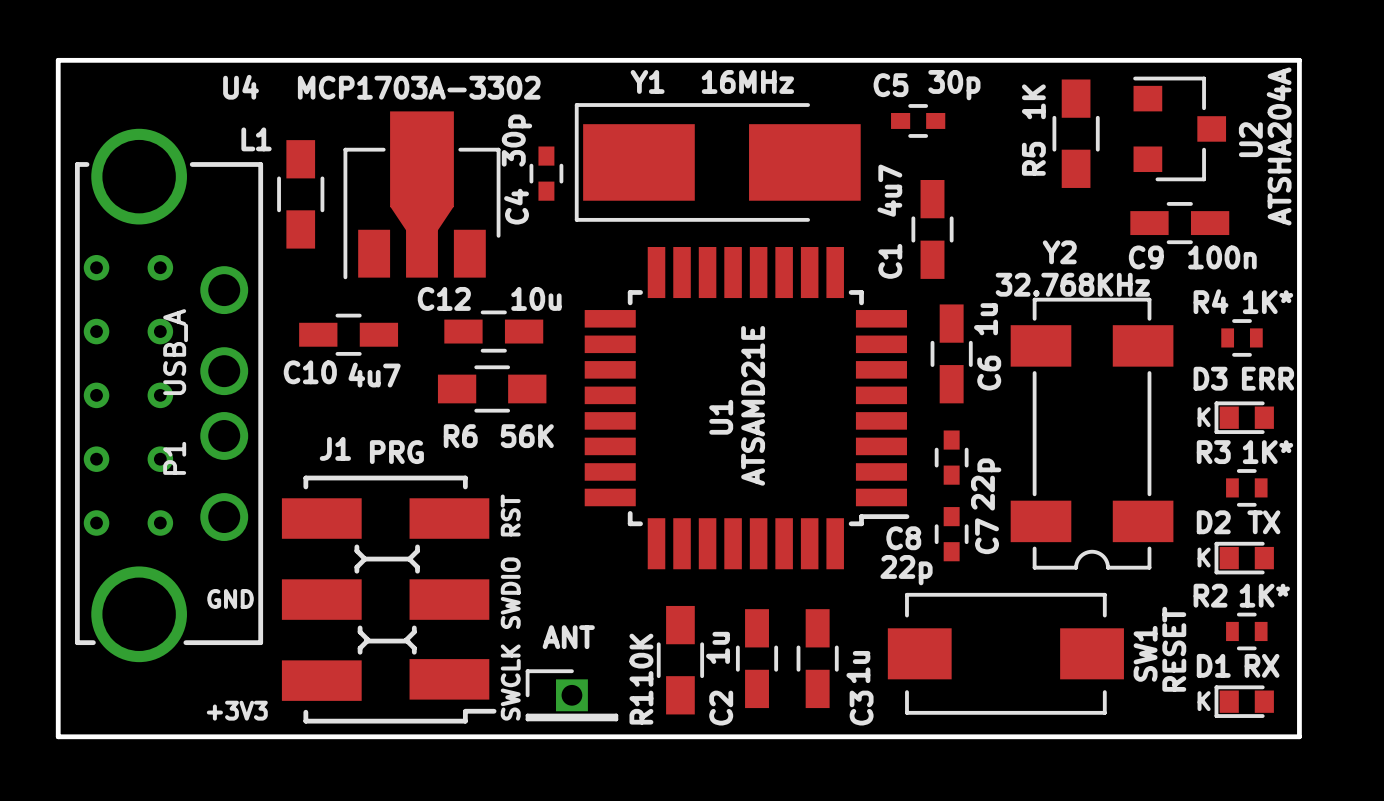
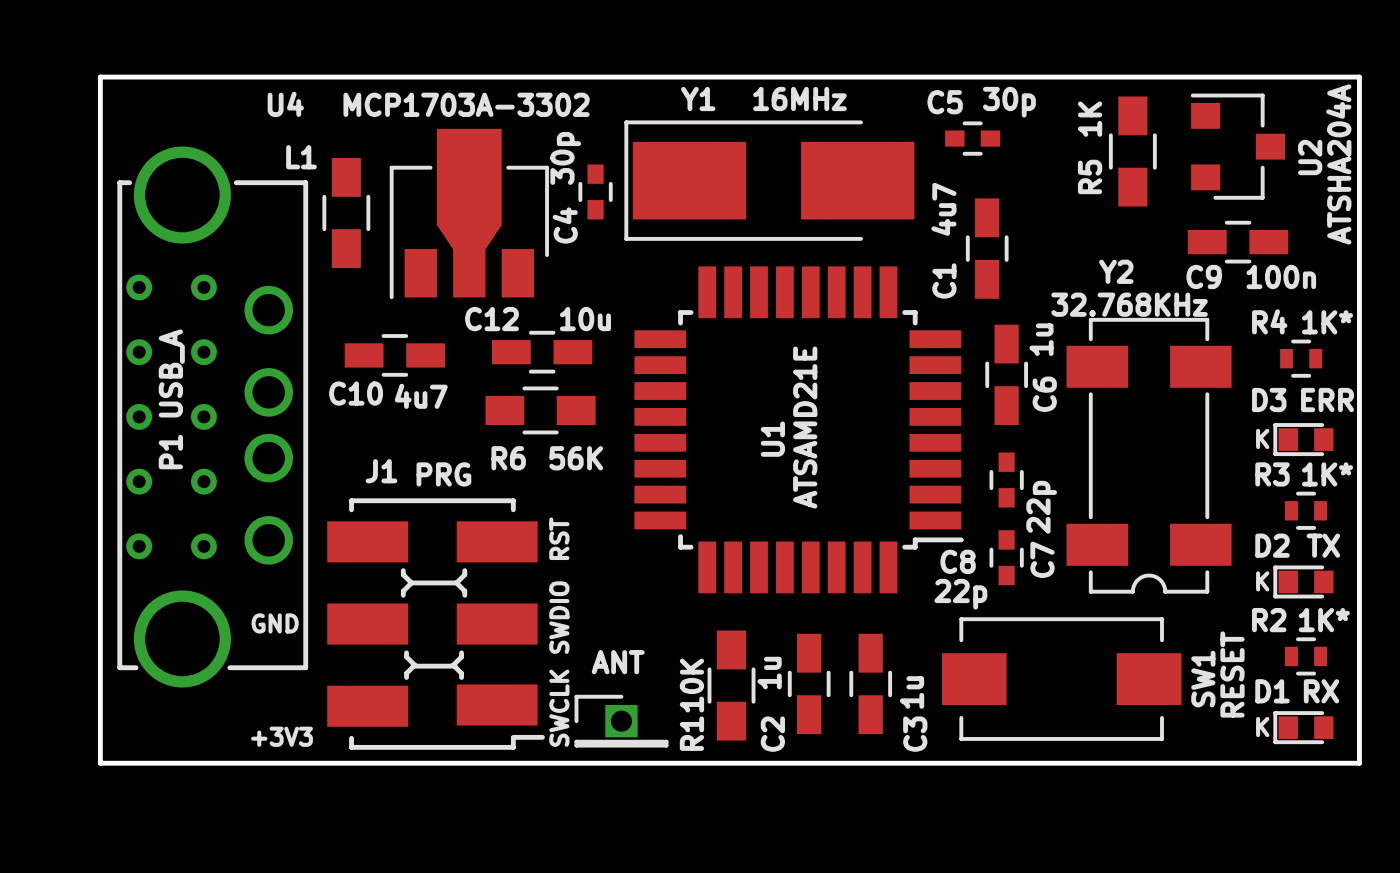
P1 value position: USB_A (175, 352) -> USB_A (171, 373)
P1 name position: P1 (174, 458) -> P1 (170, 452)

